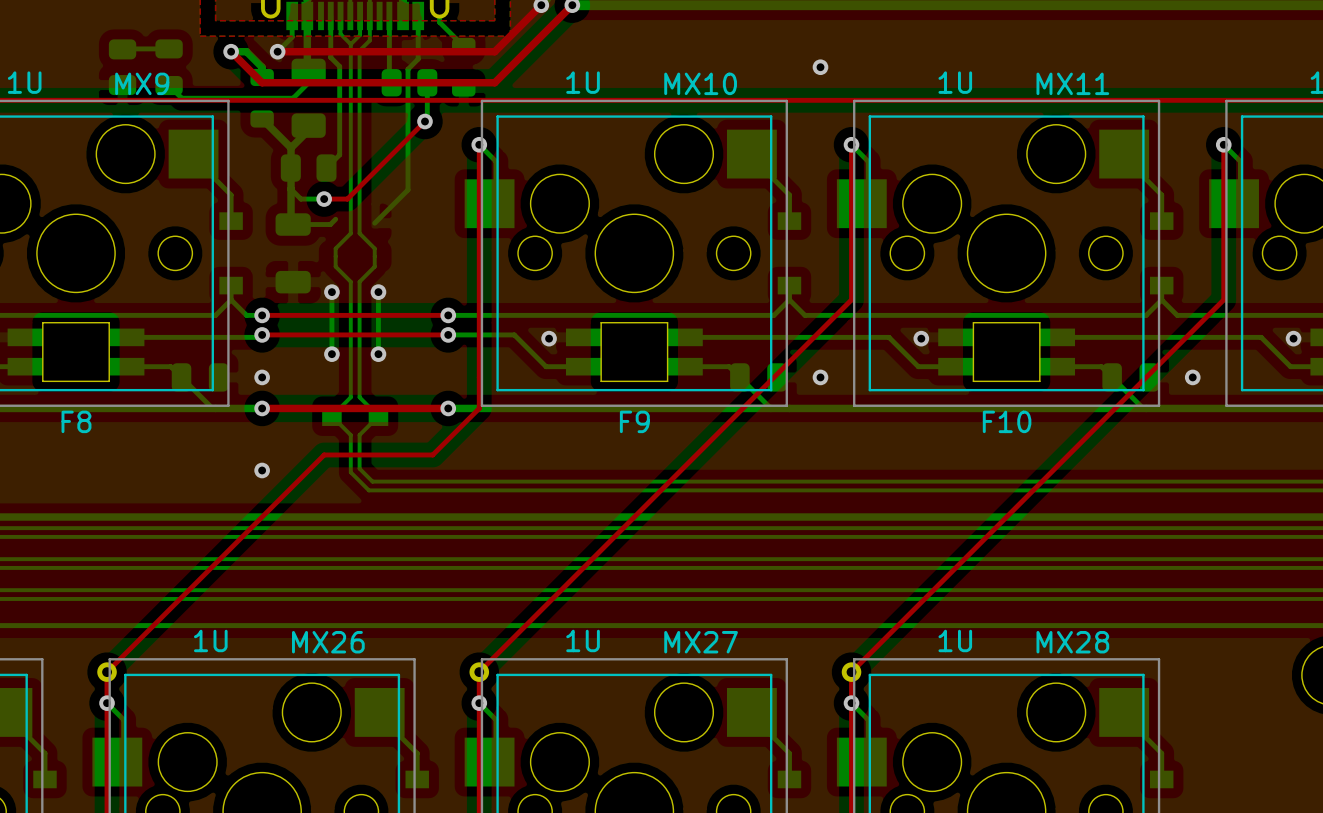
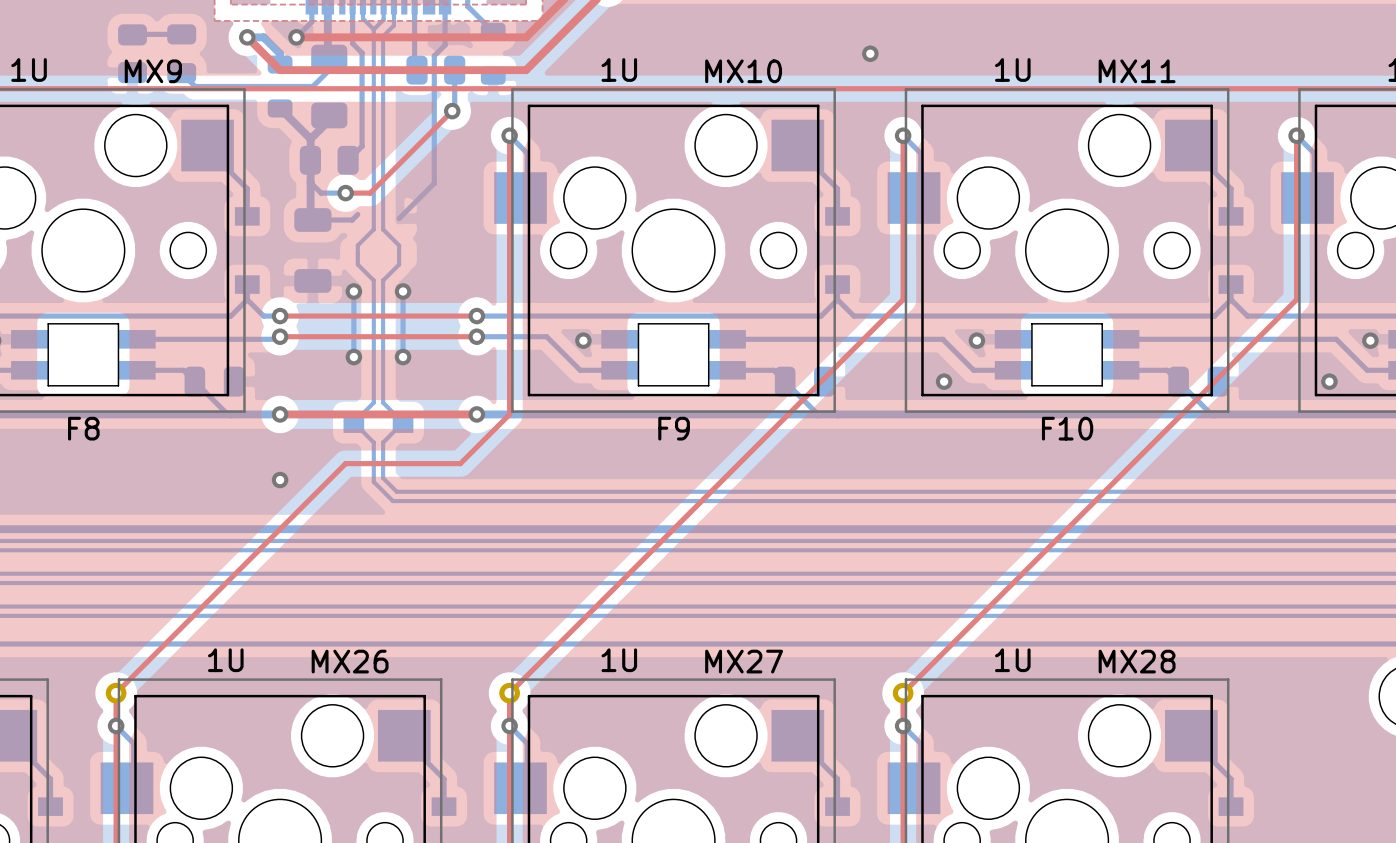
via: (262, 377) -> none
via position: (820, 377) -> (944, 381)
via position: (1192, 377) -> (1329, 381)

